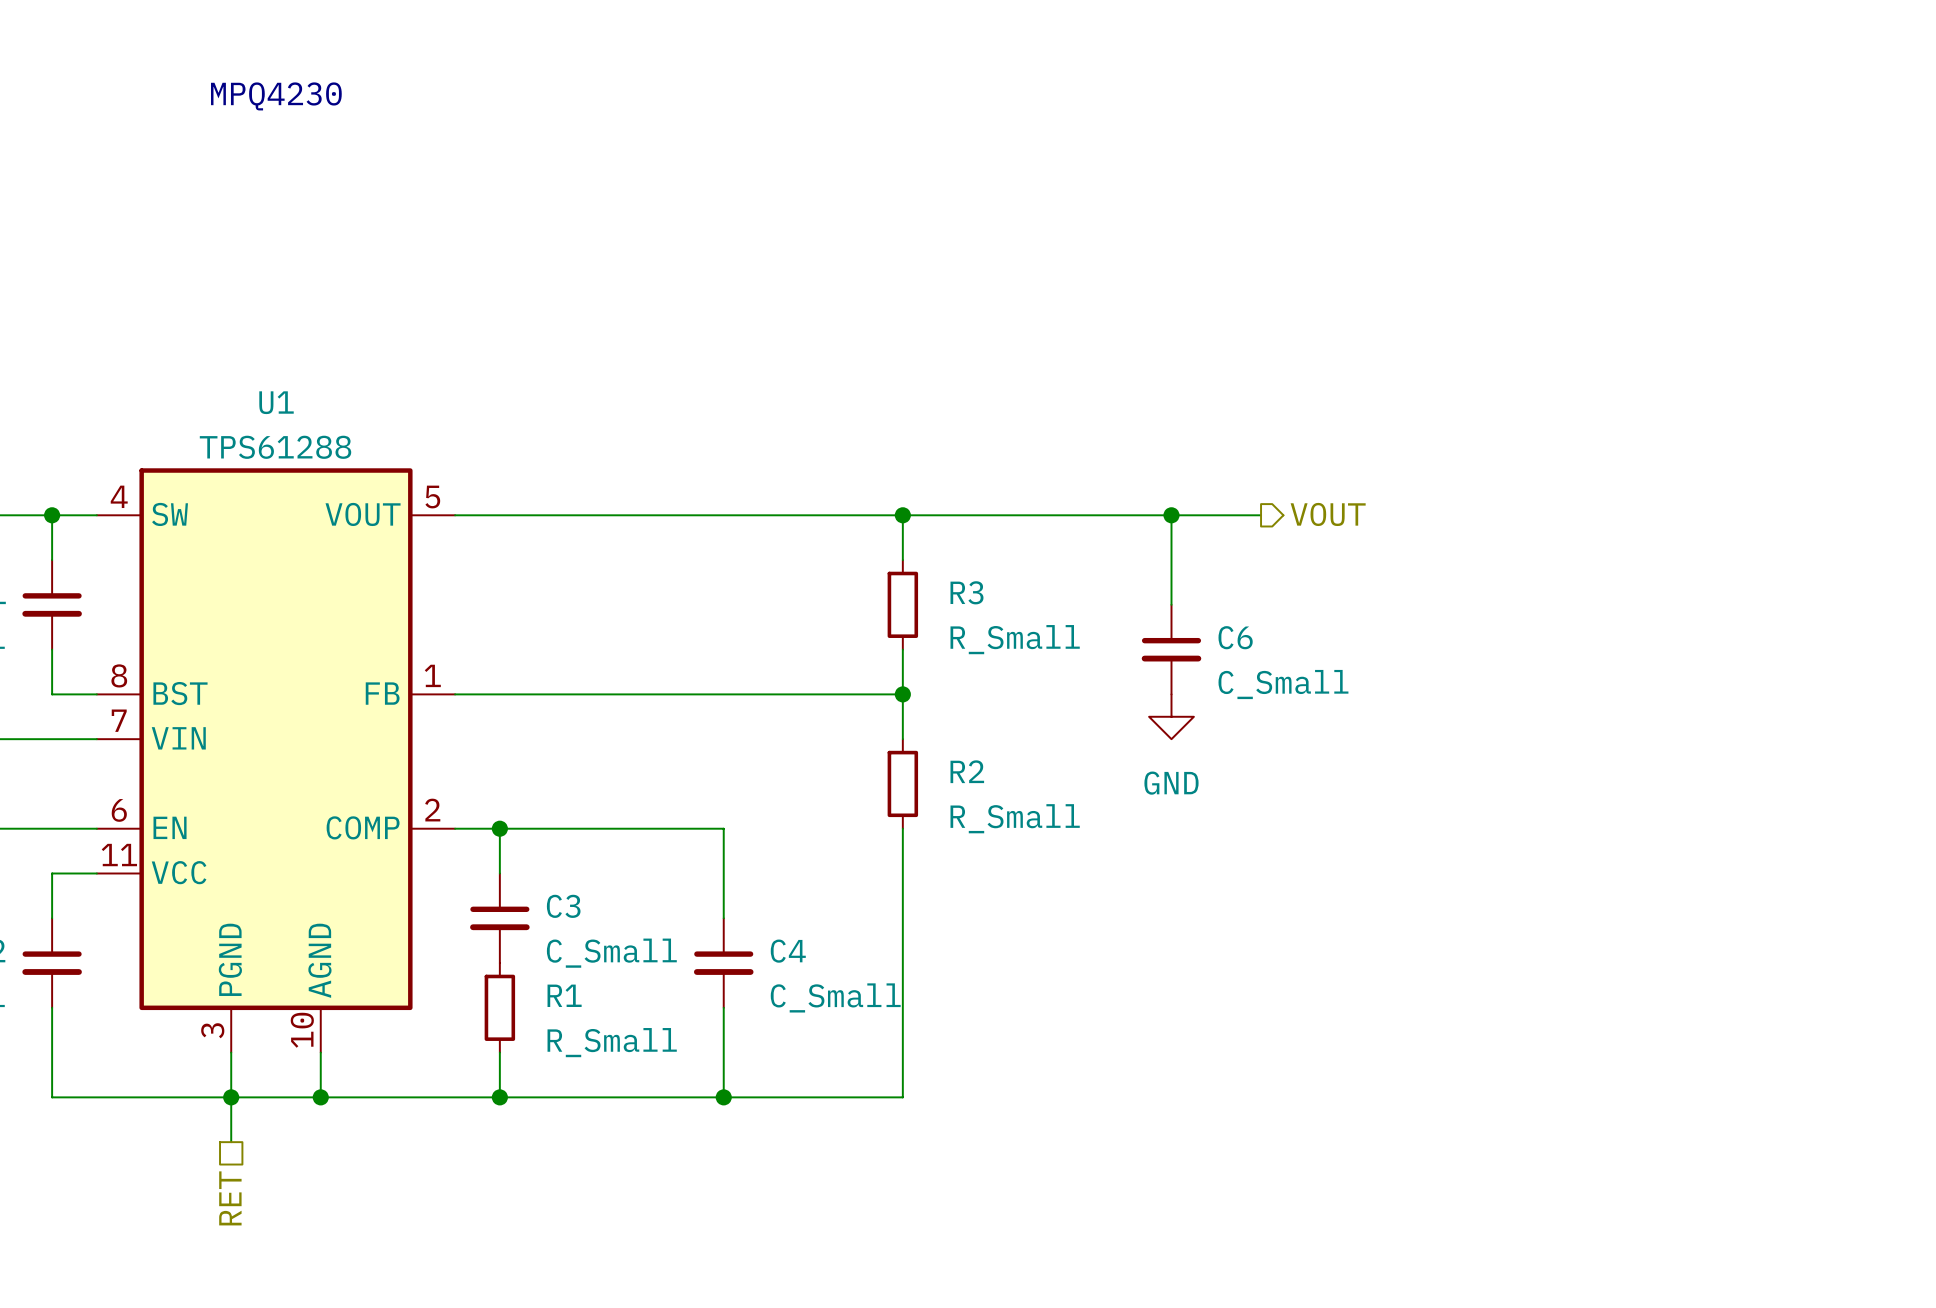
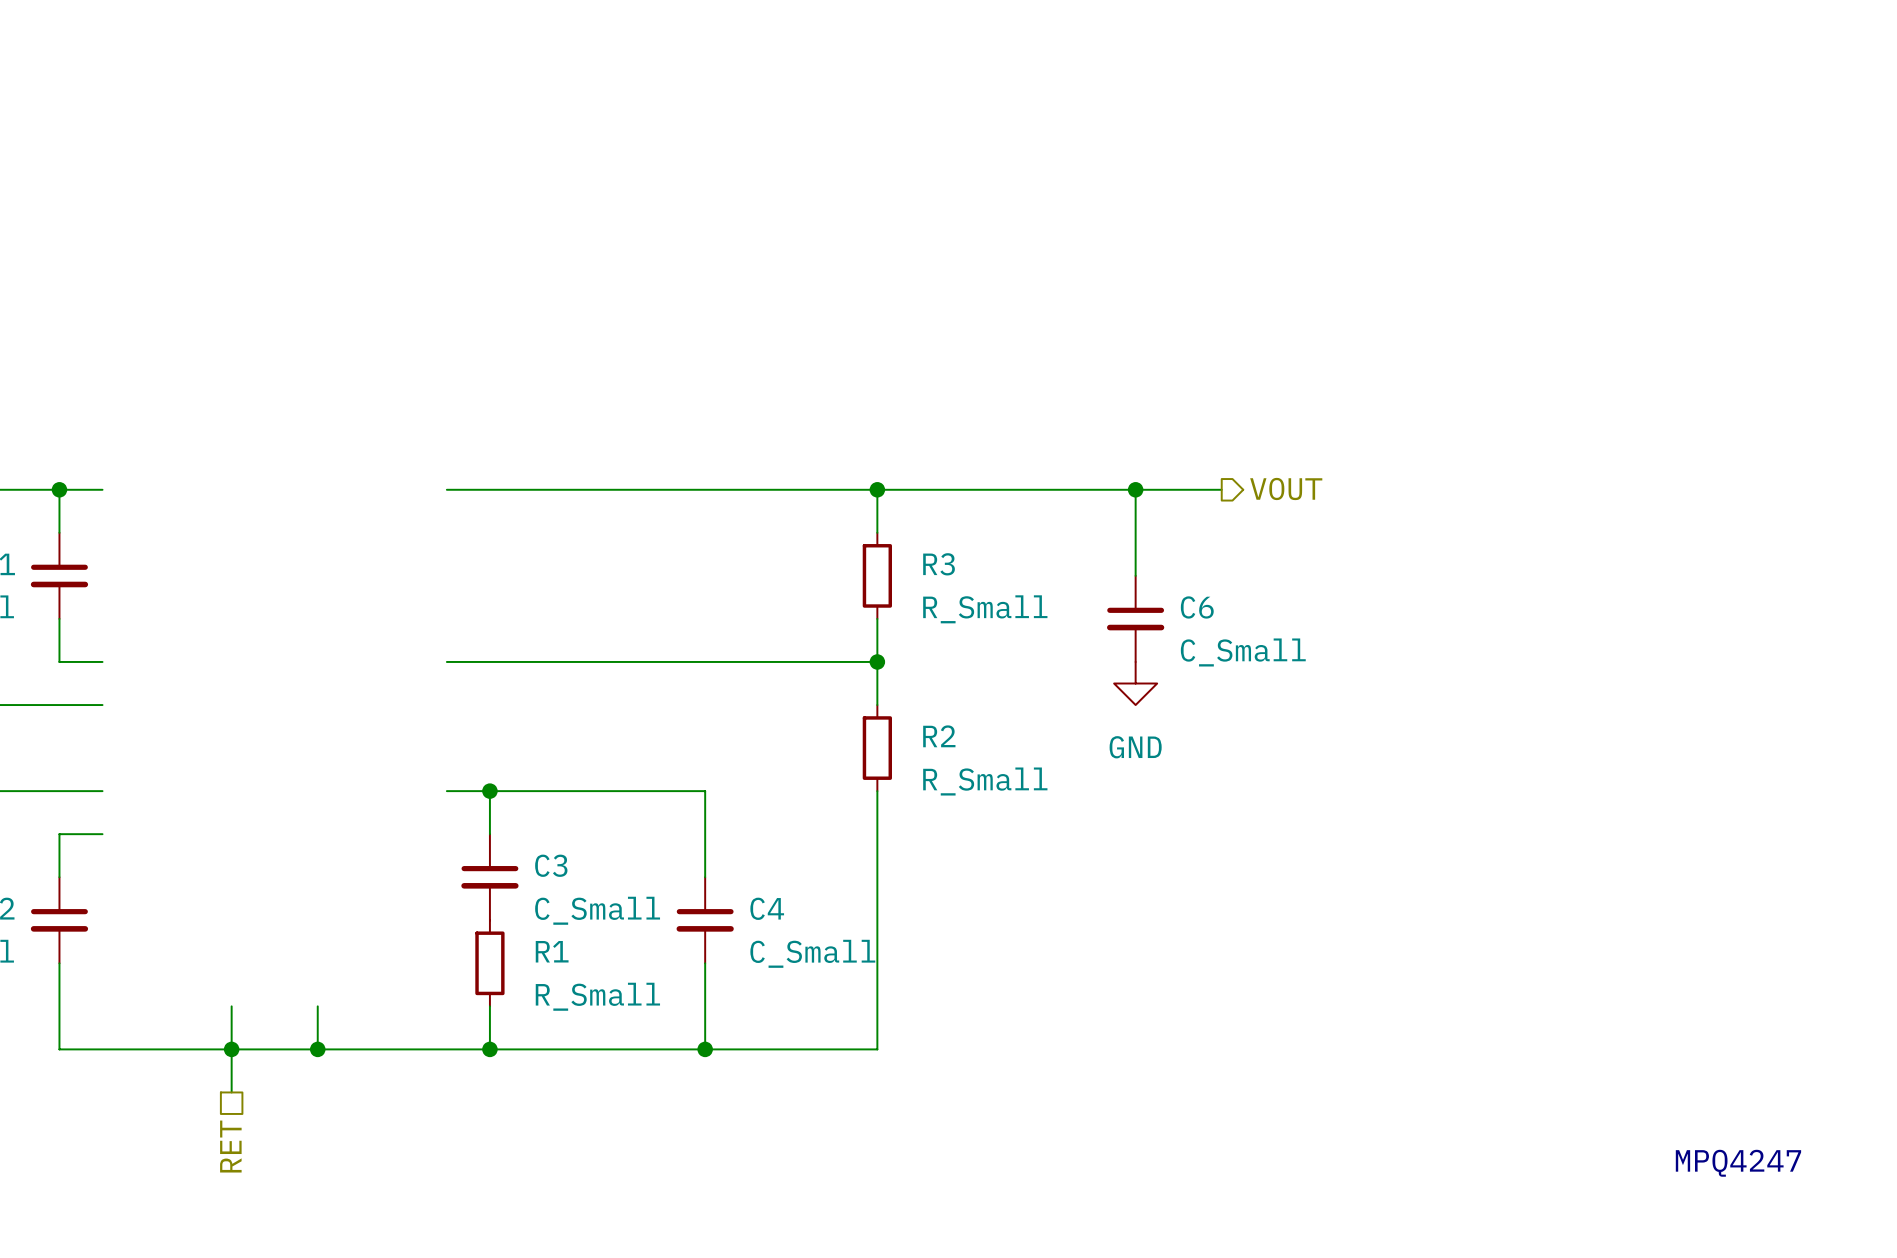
text: MPQ4230 (276, 96) -> none
U1: TPS61288 (275, 760) -> none
text: none -> MPQ4247 (1738, 1163)

